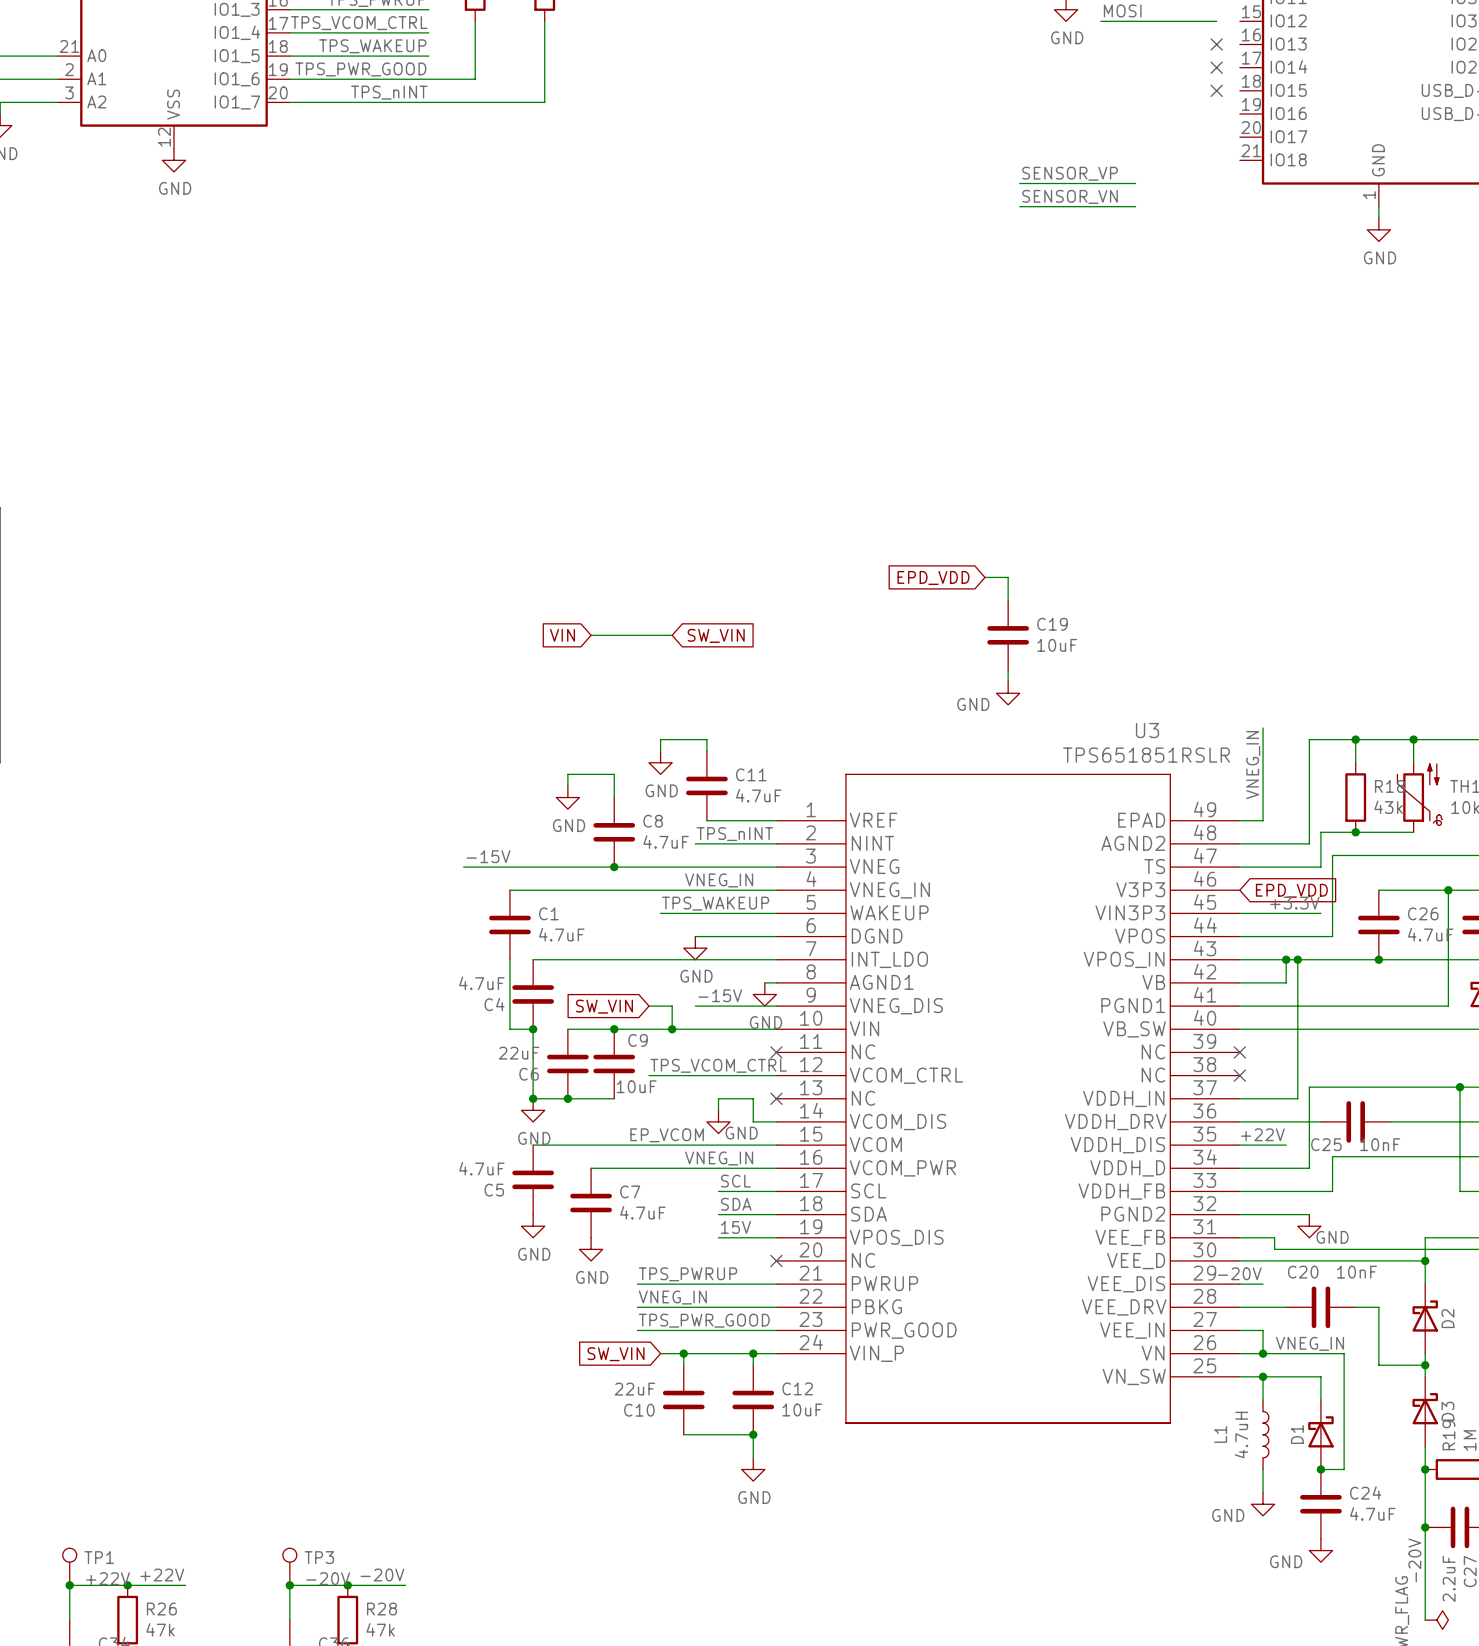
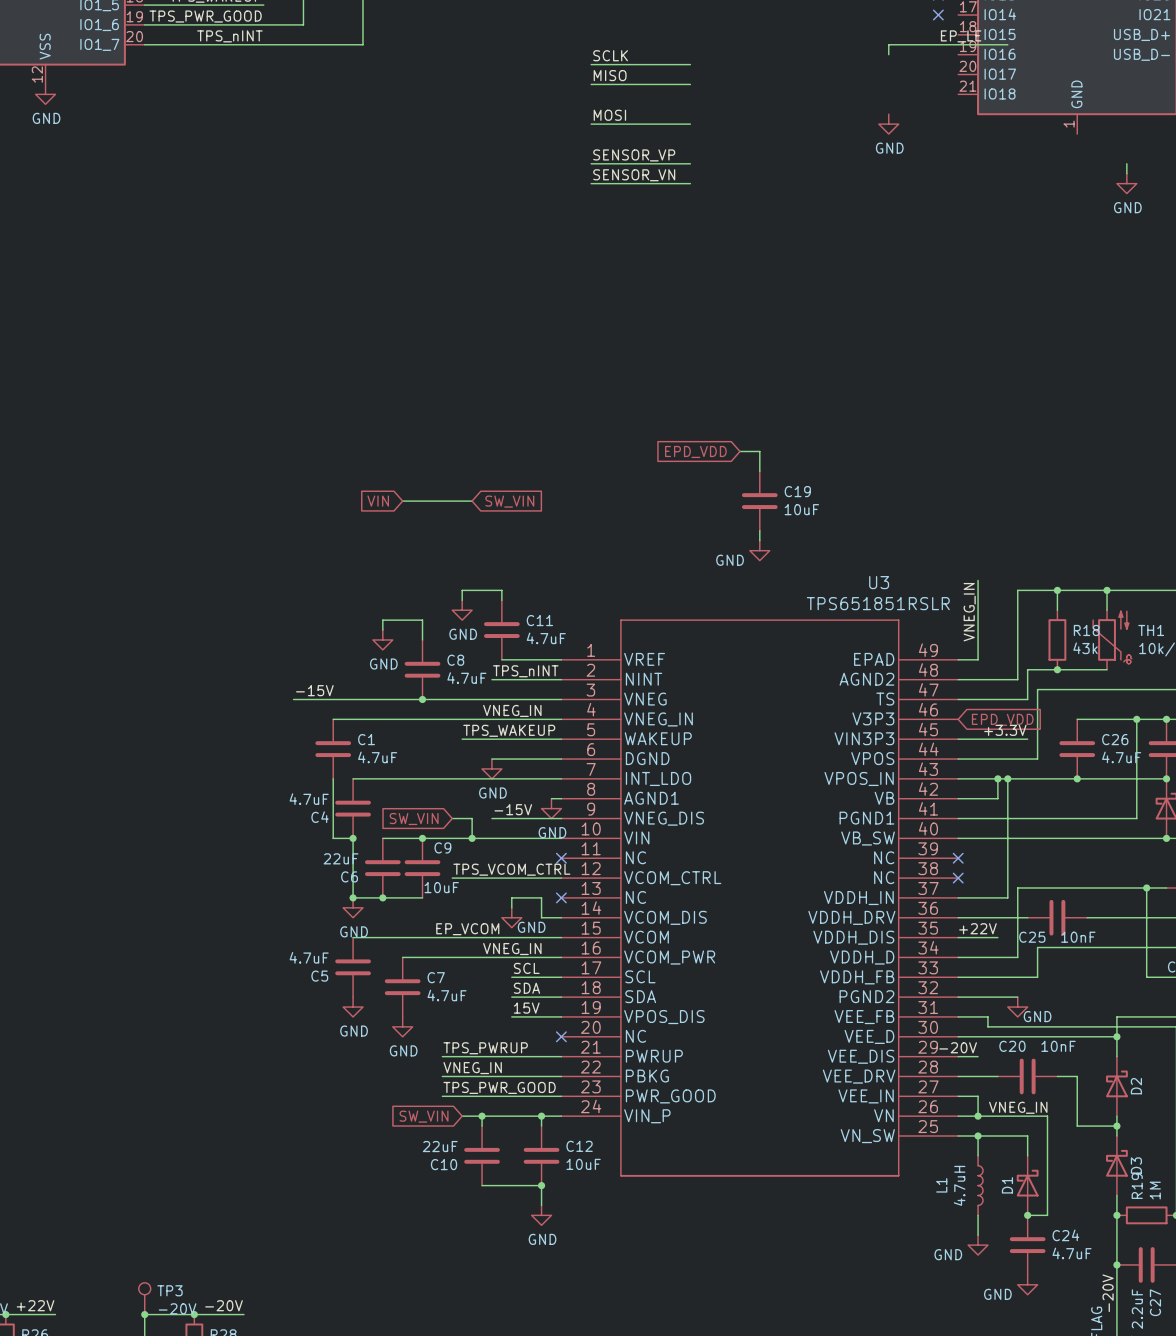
no-connect mark: (1216, 90) -> none
label: none -> EP_LE (961, 36)
wire: none -> (1007, 44) (888, 44) (888, 54)
label: none -> SCLK (610, 55)
wire: none -> (591, 64) (690, 64)
label: none -> MISO (610, 75)
label position: SENSOR_VP (1070, 173) -> SENSOR_VP (634, 155)
wire: (1019, 183) (1135, 183) -> (591, 163) (690, 163)
label: none -> MOSI (609, 115)
wire: none -> (591, 124) (690, 124)
power symbol: none -> GND (888, 124)
label position: SENSOR_VN (1070, 196) -> SENSOR_VN (634, 175)
wire: (1019, 206) (1135, 206) -> (591, 84) (690, 84)
wire: (1378, 206) (1378, 218) -> (1126, 163) (1126, 173)
power symbol position: GND (1378, 229) -> GND (1126, 183)
wire: none -> (591, 183) (690, 183)

